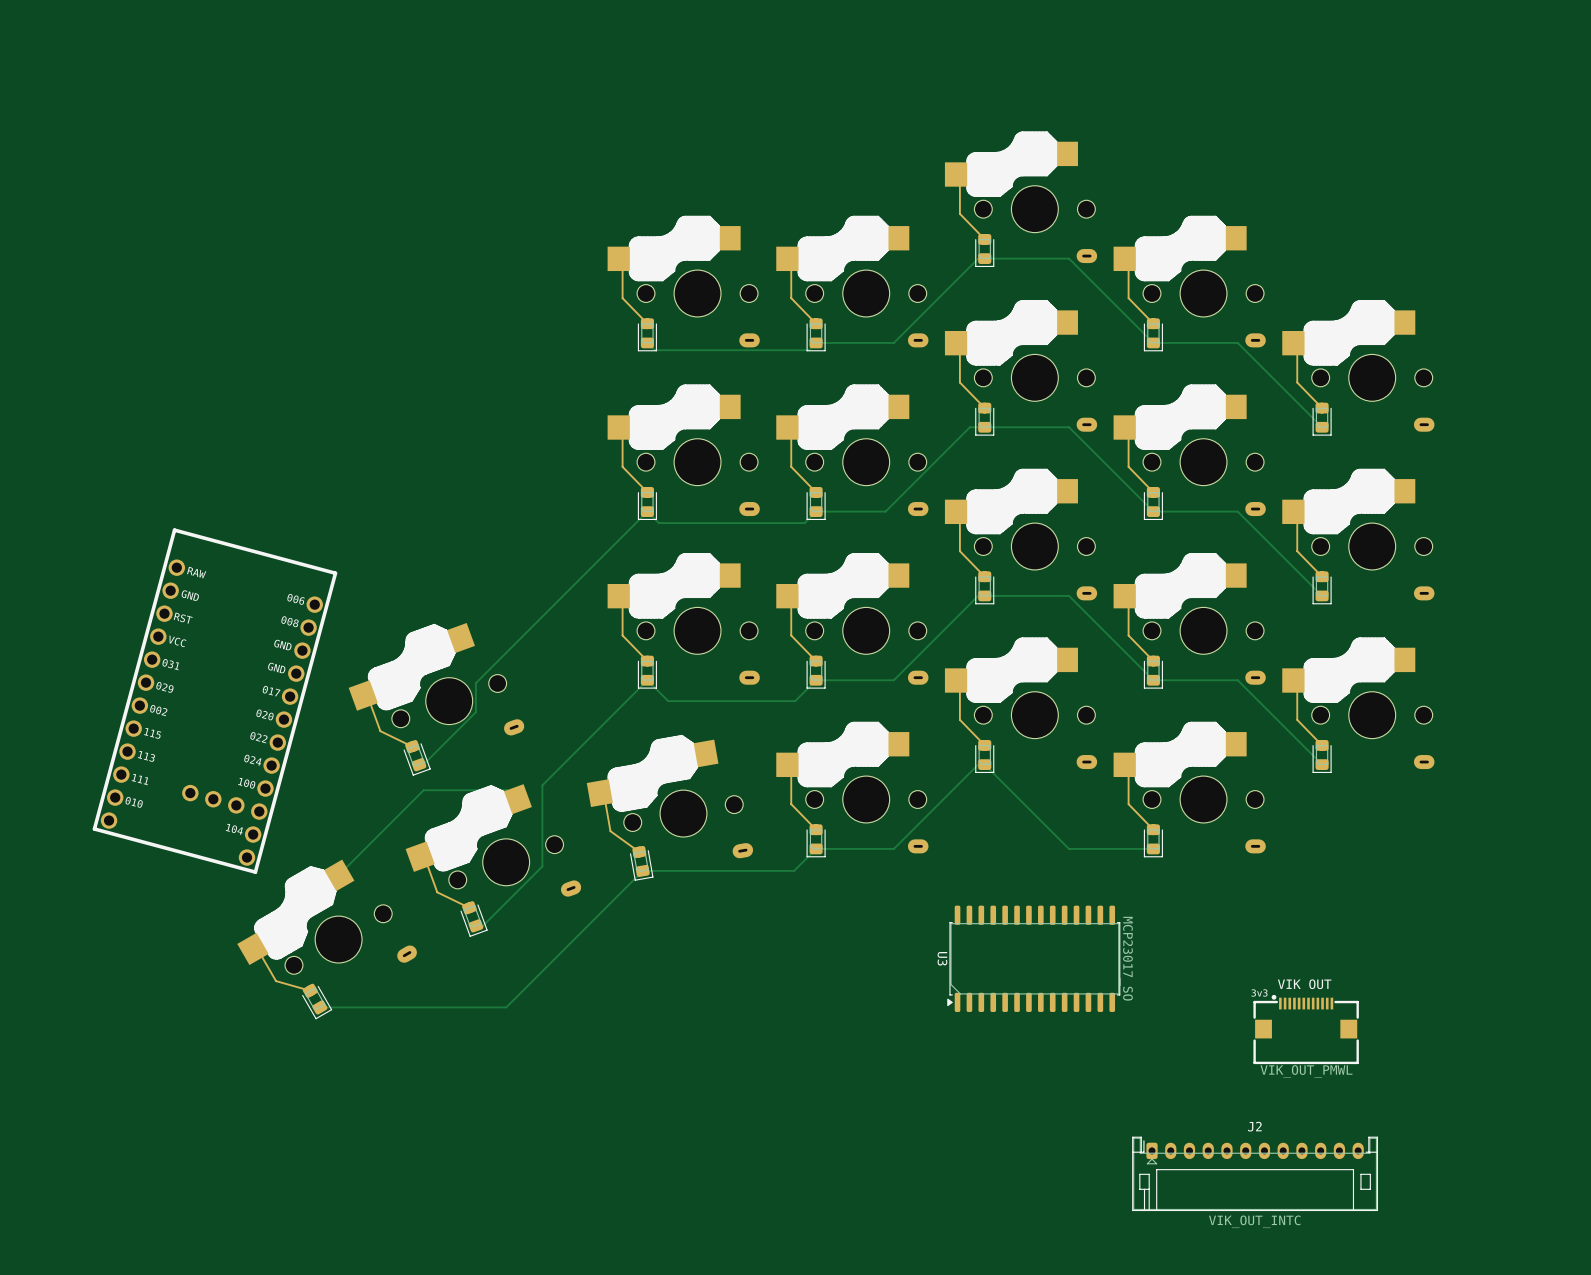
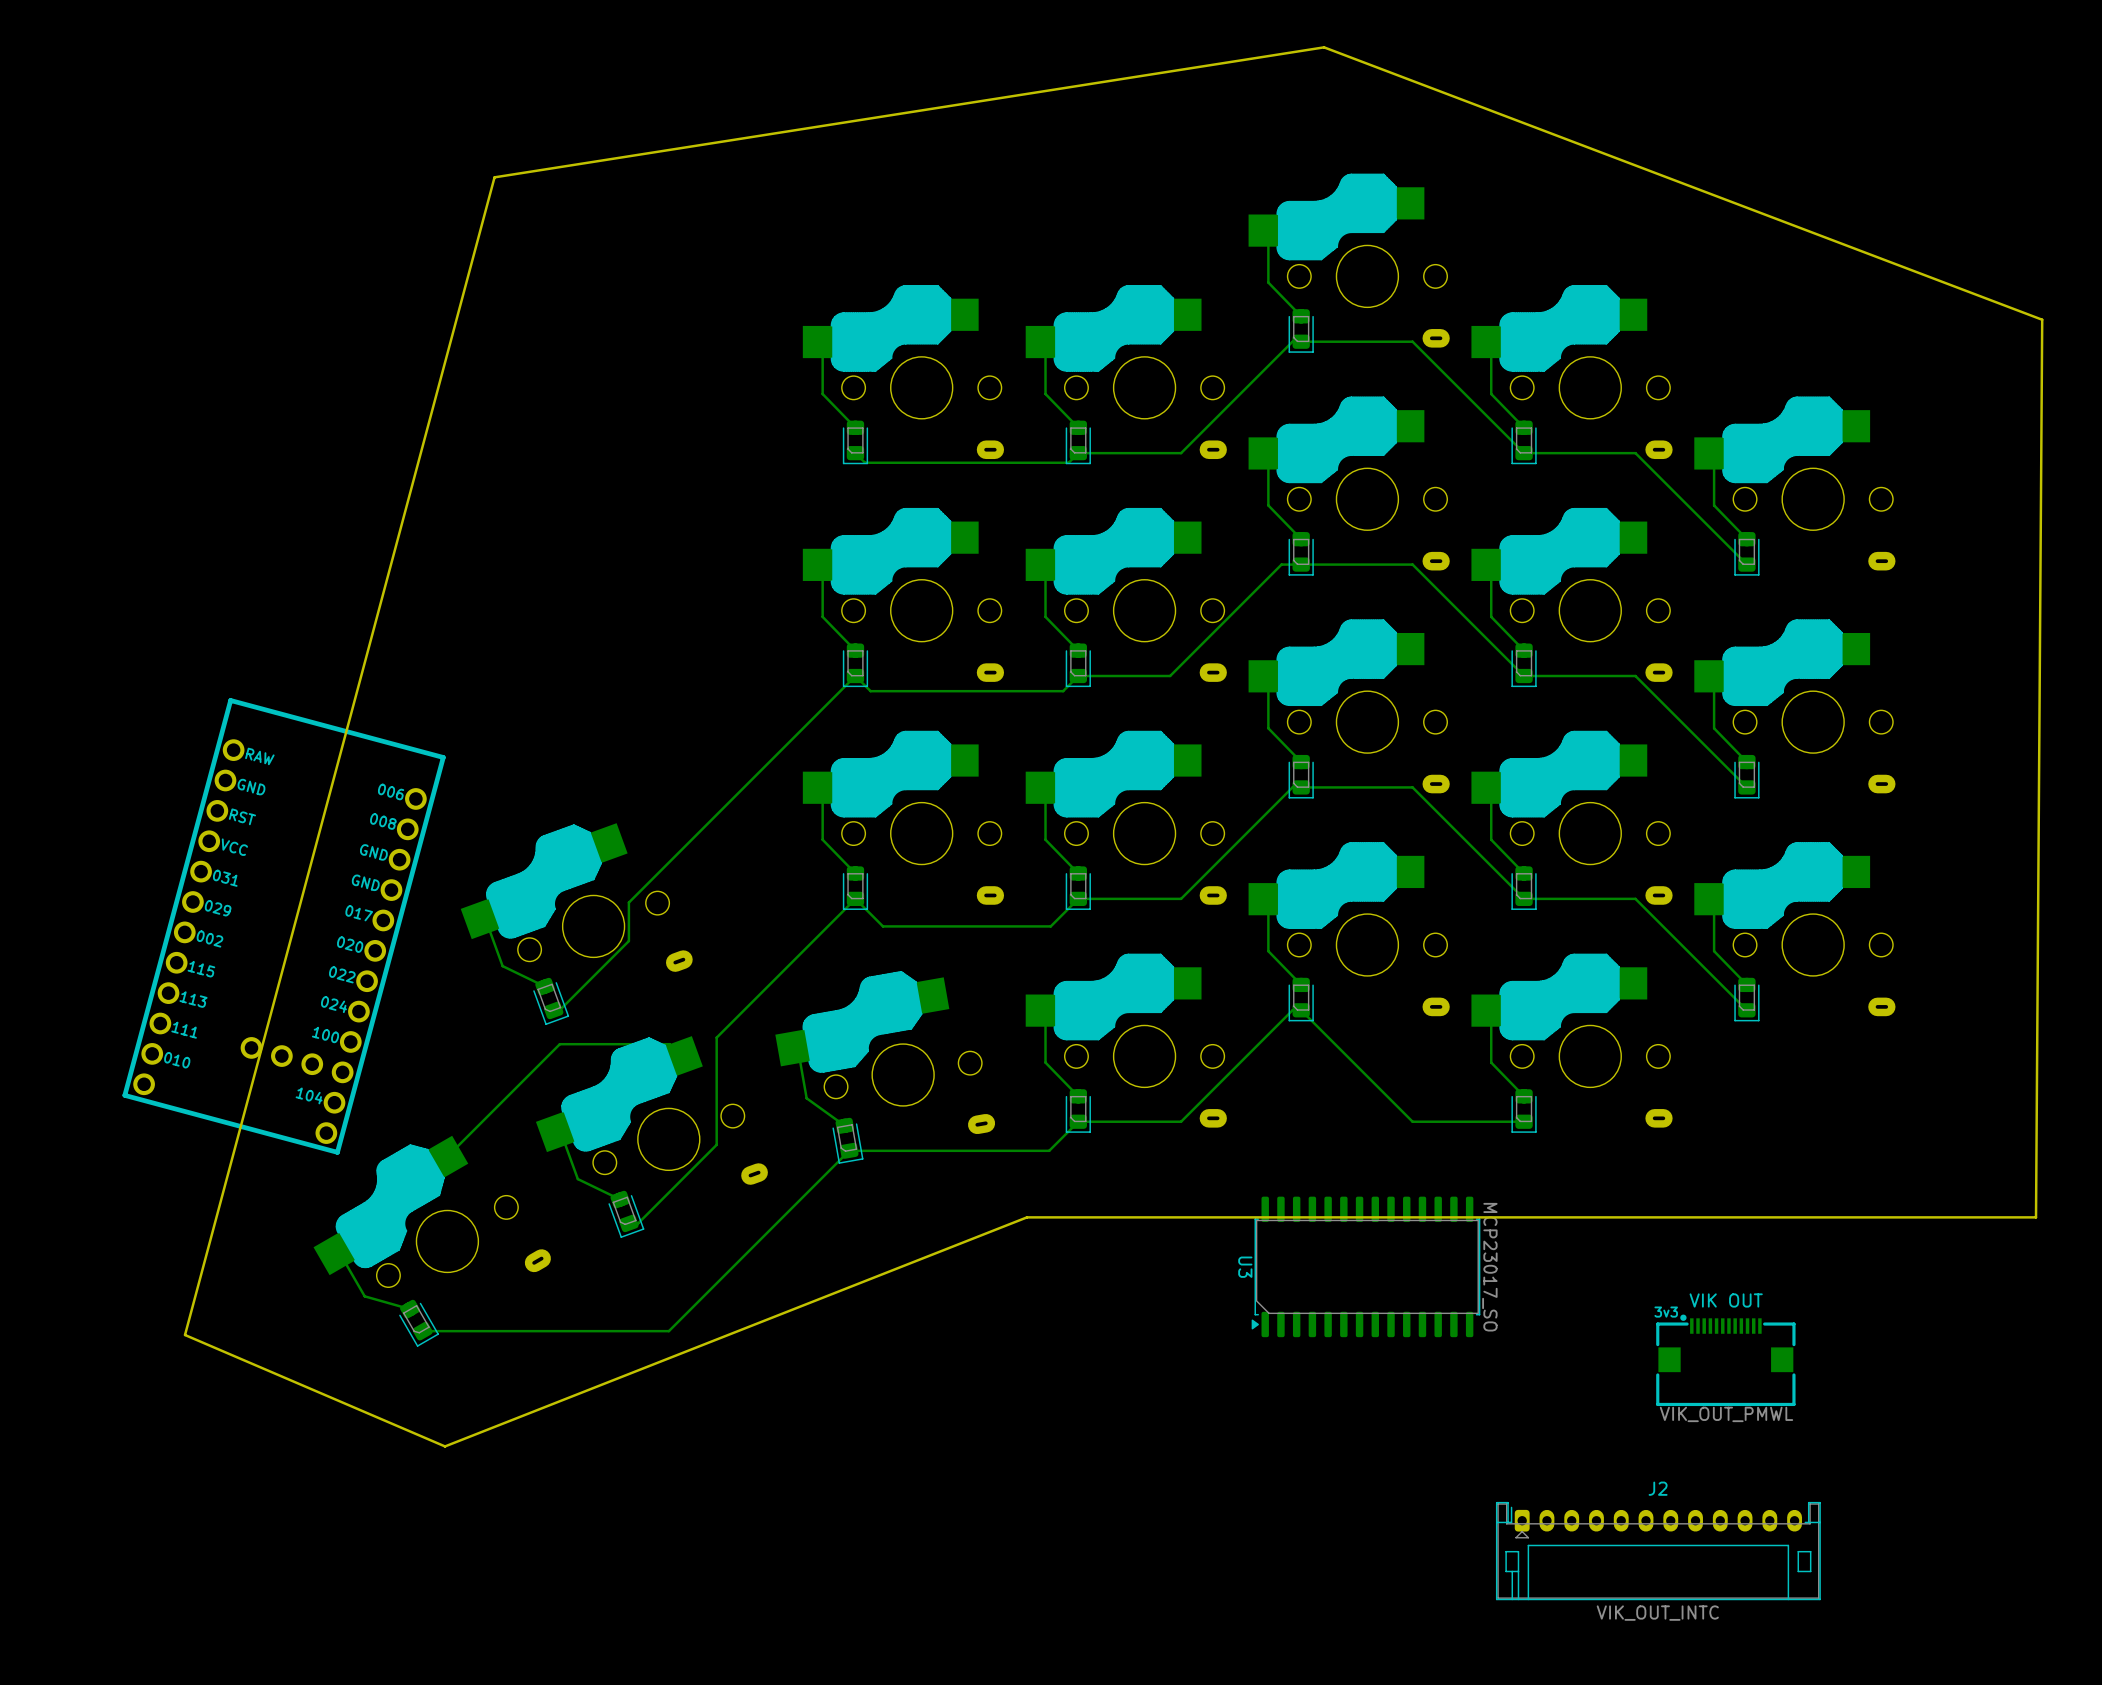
board edge: none -> (1324, 47) (494, 177) (185, 1335) (445, 1446) (1026, 1217) (2036, 1217) (2042, 319) (1324, 47)

